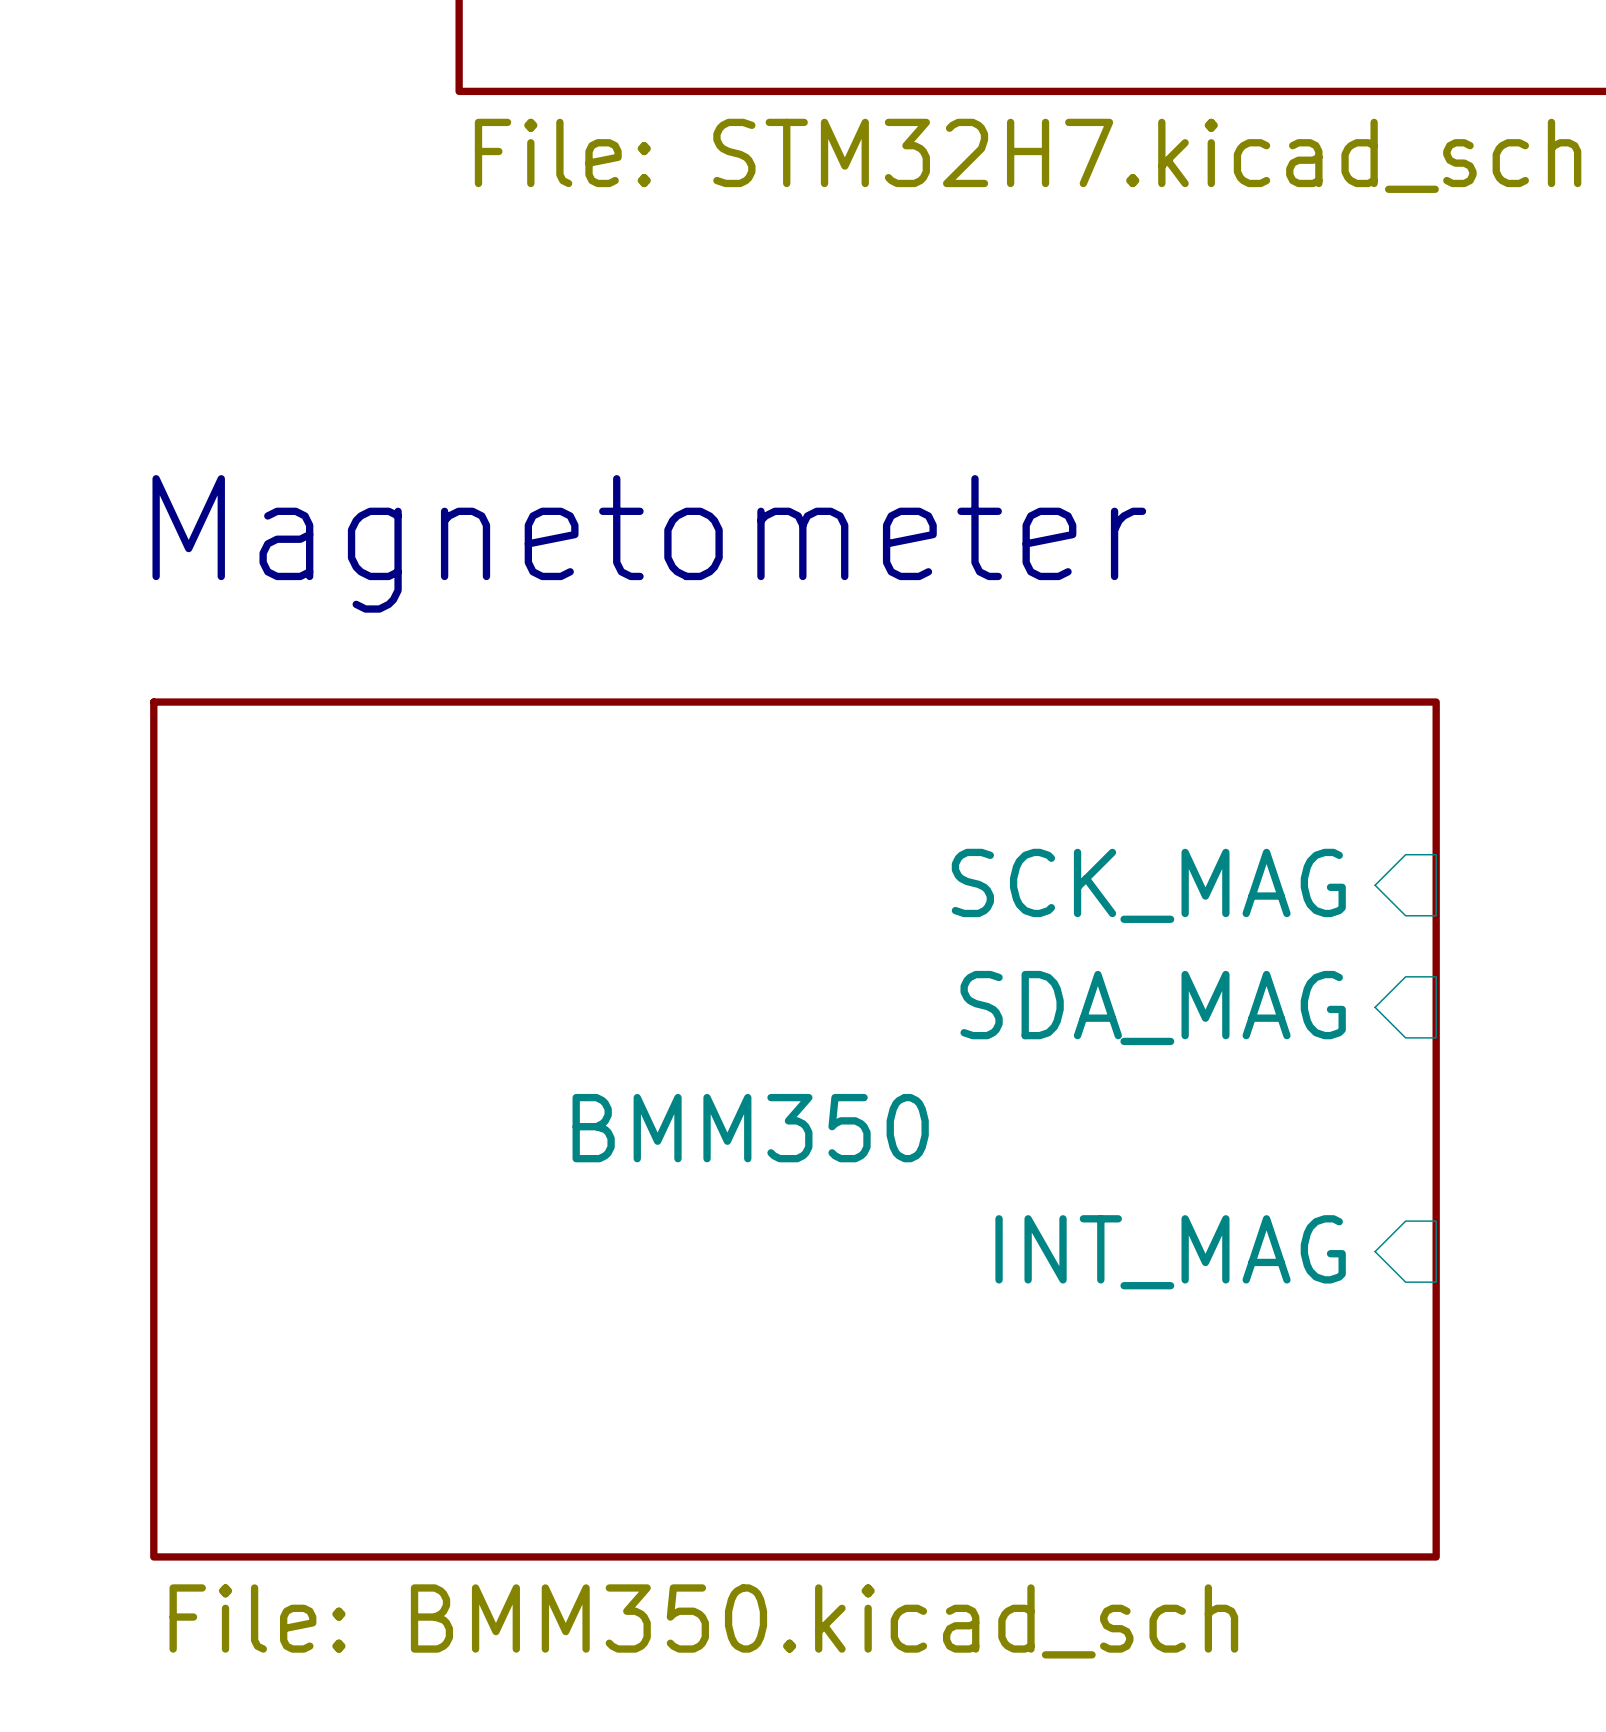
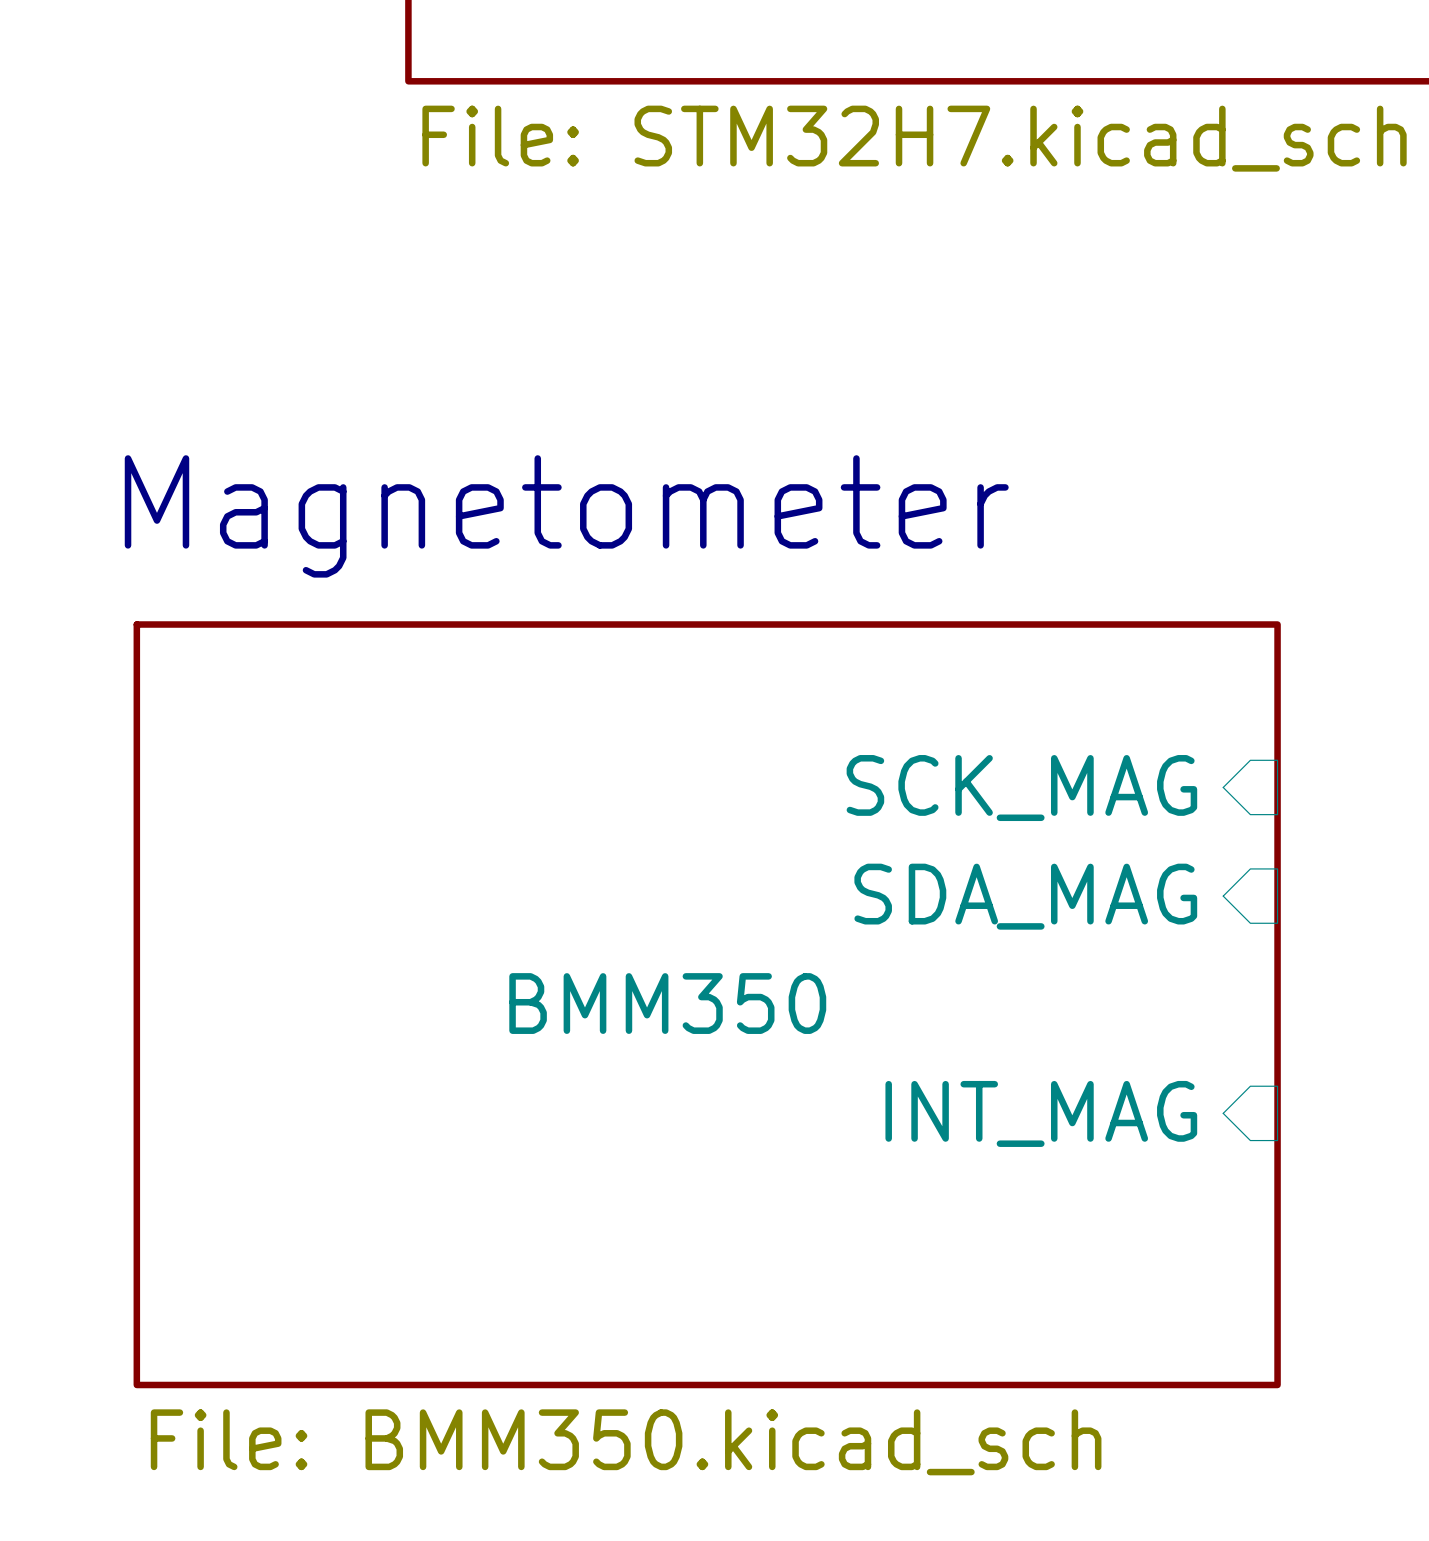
text position: Magnetometer (649, 543) -> Magnetometer (566, 516)

